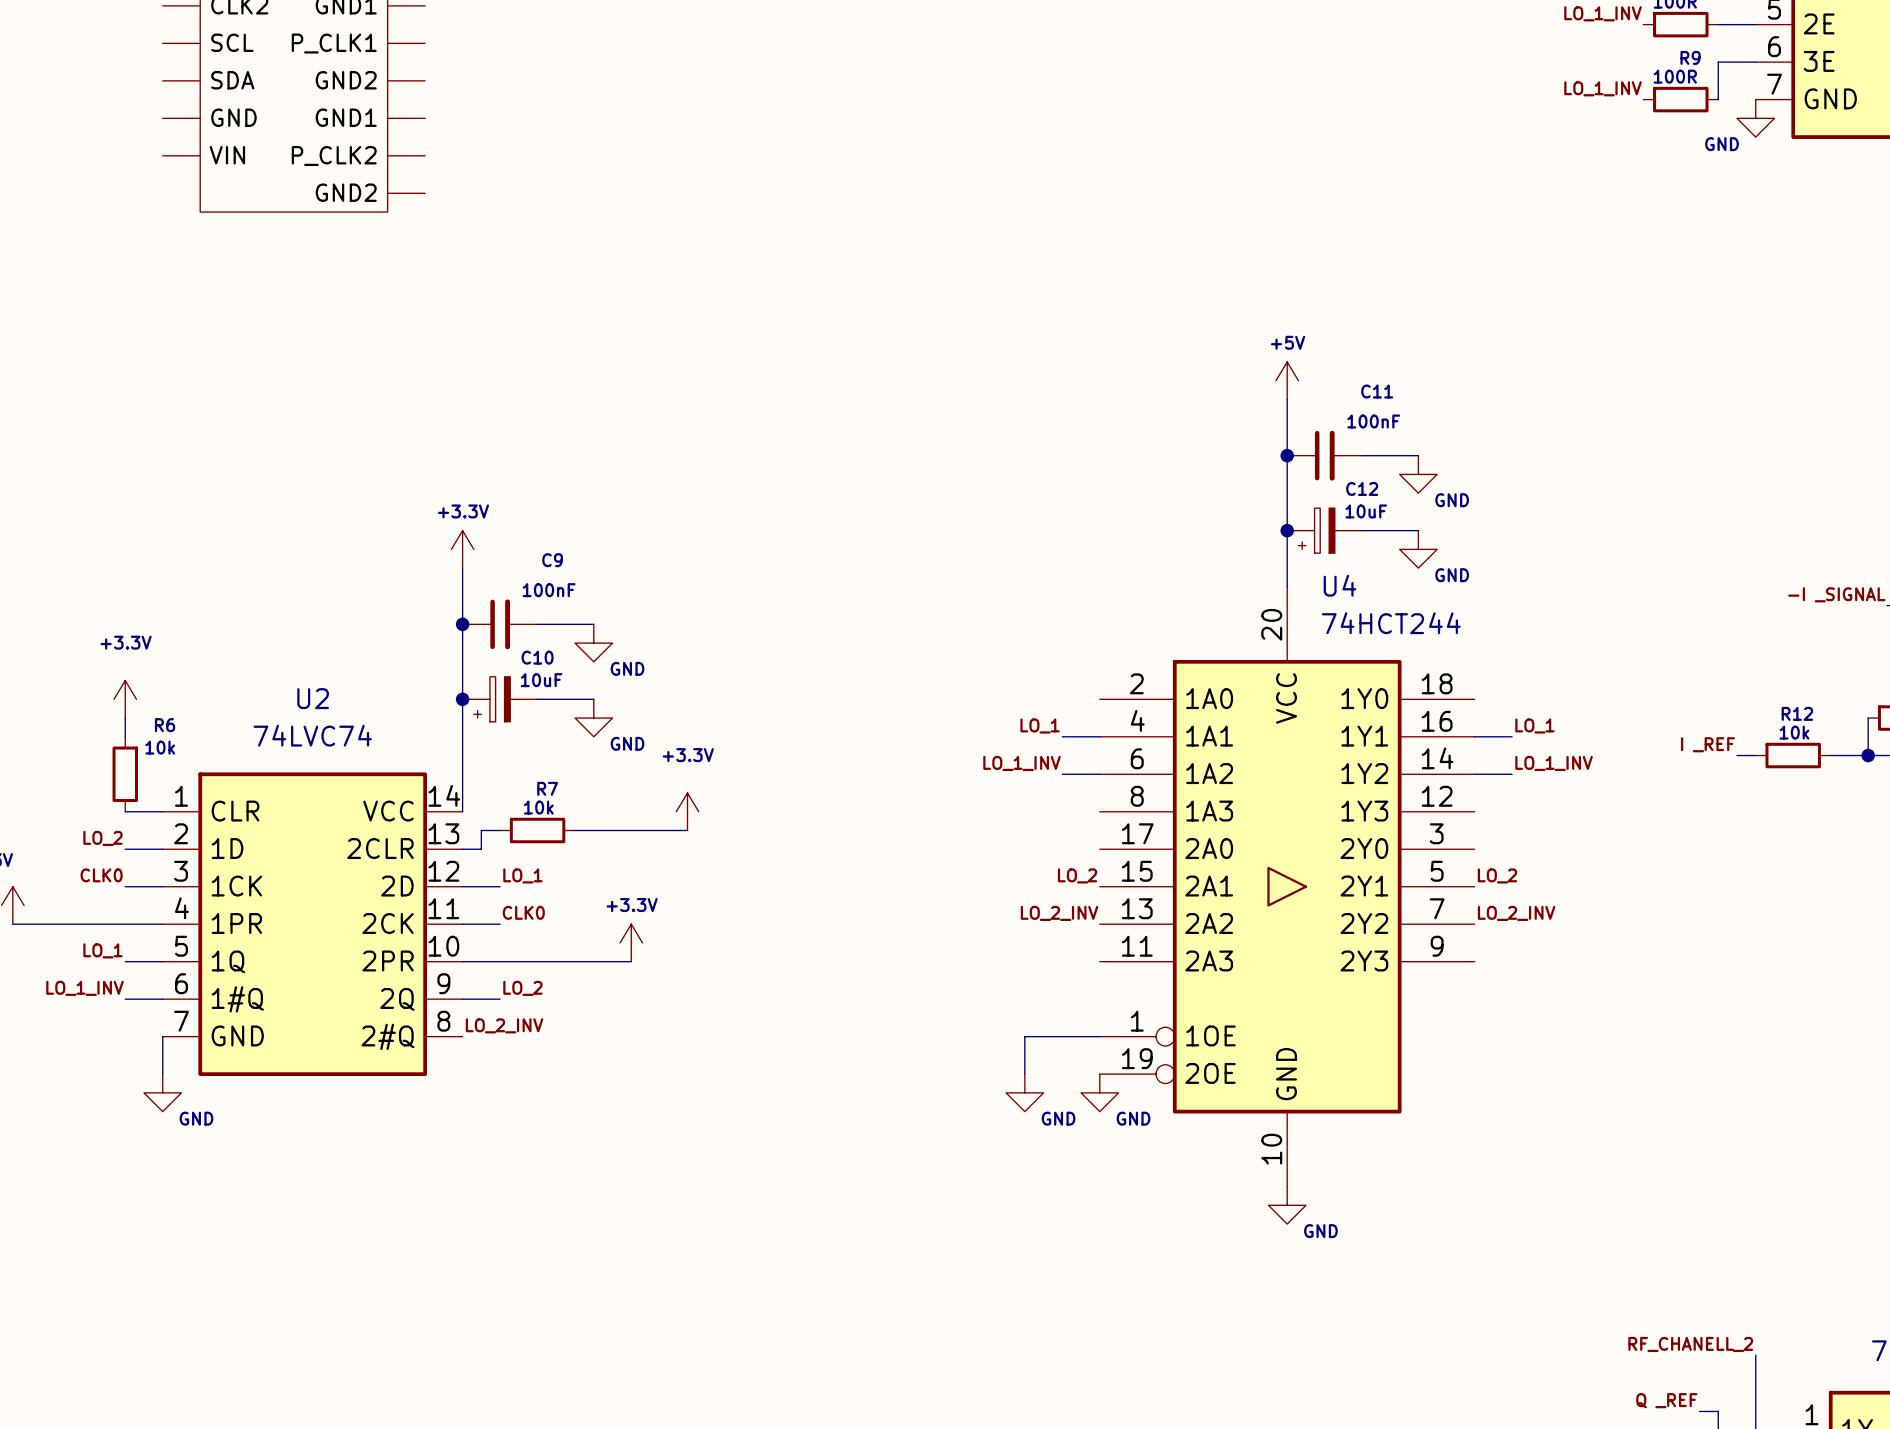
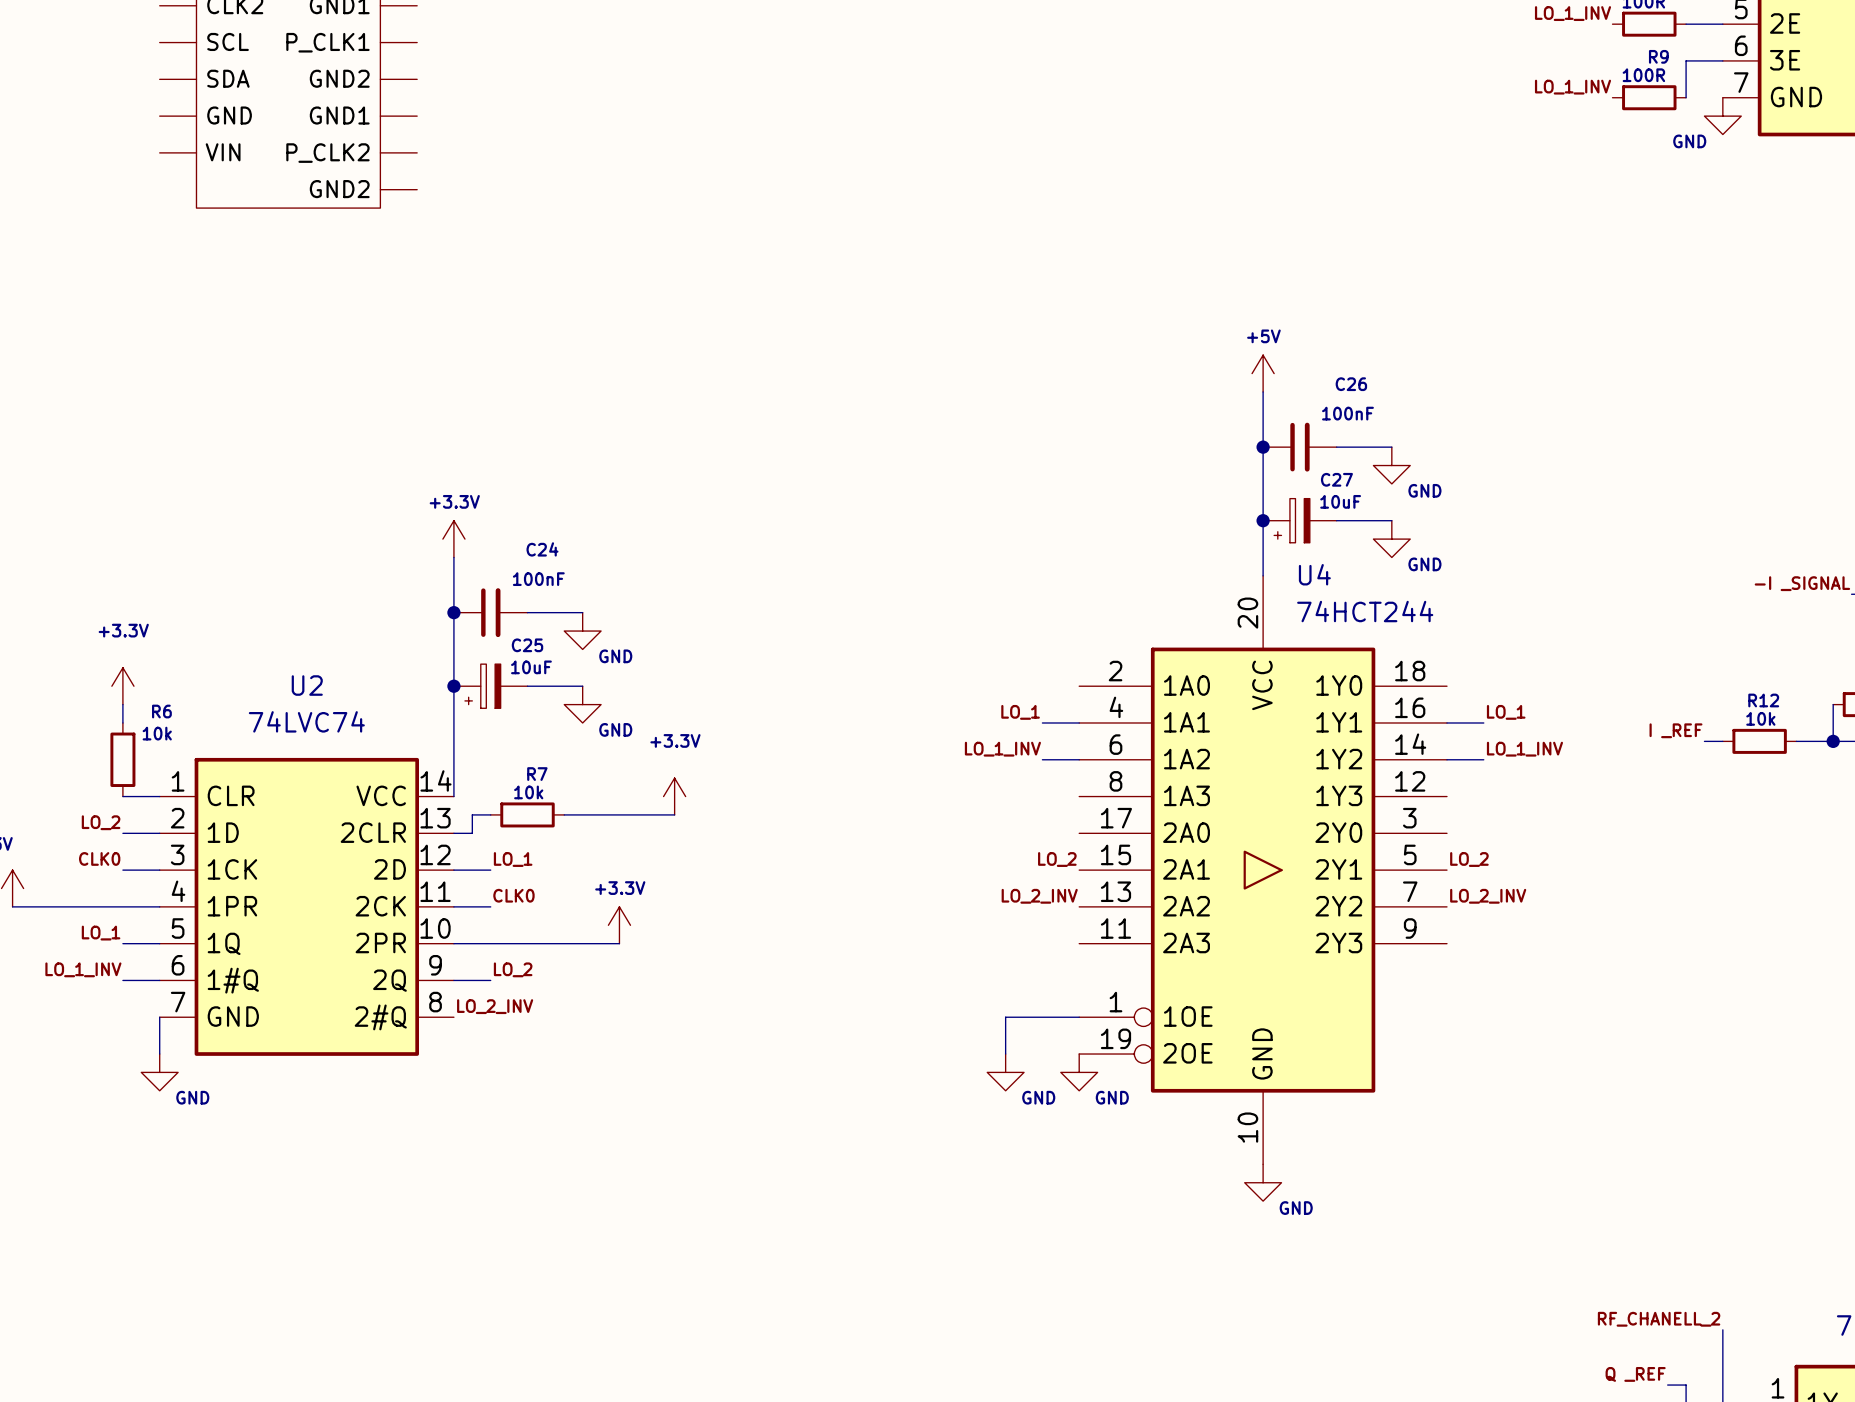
C11 name: C11 (1377, 391) -> C26 (1351, 384)
C12 name: C12 (1362, 488) -> C27 (1336, 479)
C9 name: C9 (552, 560) -> C24 (542, 549)
C10 name: C10 (537, 657) -> C25 (527, 645)

